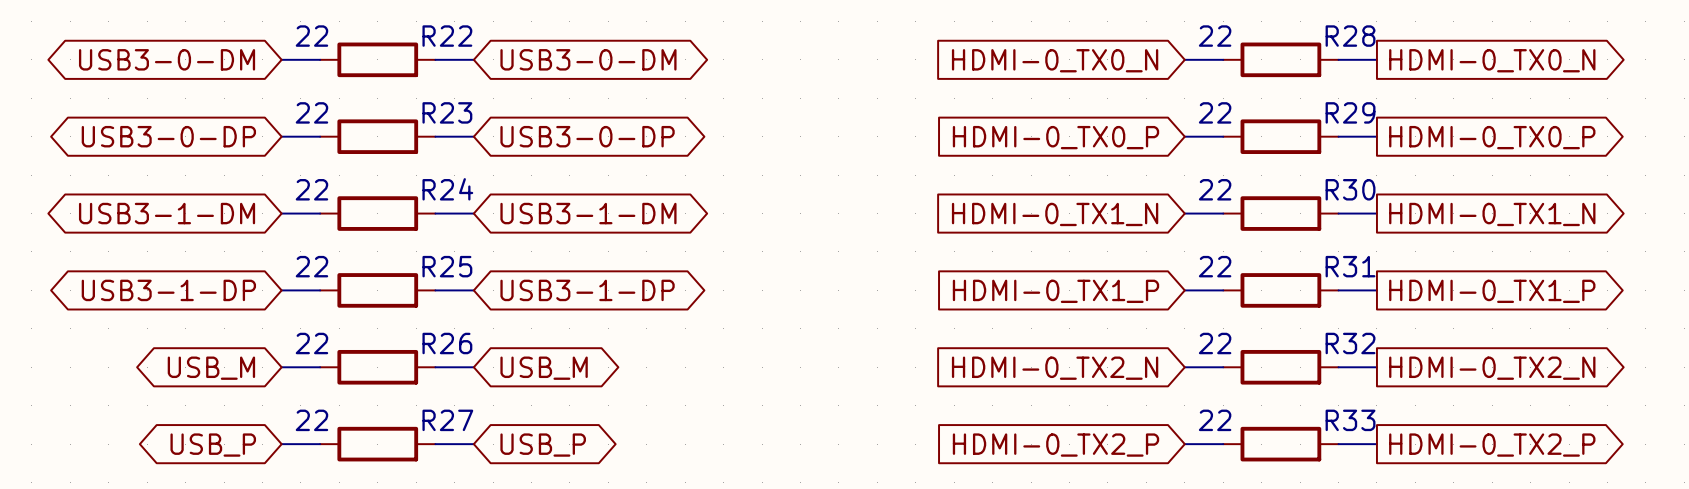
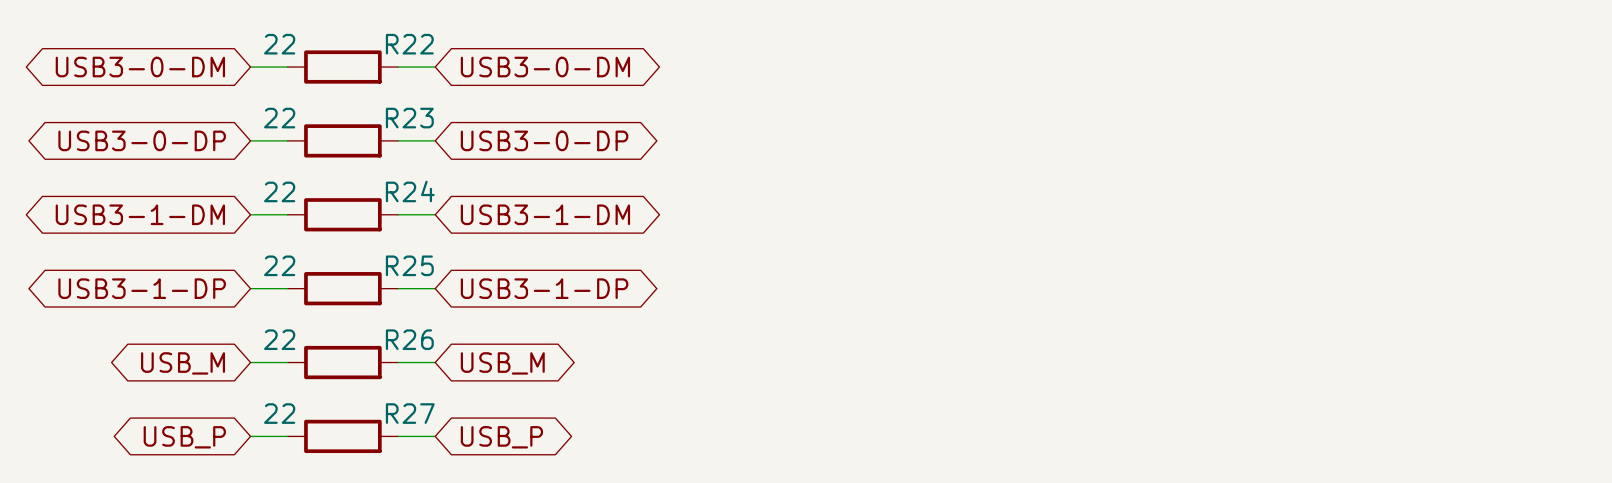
wire: (1184, 59) (1223, 59) -> none
R28: 22 (1280, 59) -> none
wire: (1338, 59) (1376, 59) -> none
global label: HDMI-0_TX0_N (1055, 60) -> none
global label: HDMI-0_TX0_N (1492, 60) -> none
wire: (1184, 136) (1223, 136) -> none
R29: 22 (1280, 136) -> none
wire: (1338, 136) (1376, 136) -> none
global label: HDMI-0_TX0_P (1055, 137) -> none
global label: HDMI-0_TX0_P (1492, 137) -> none
wire: (1184, 213) (1223, 213) -> none
R30: 22 (1280, 213) -> none
wire: (1338, 213) (1376, 213) -> none
global label: HDMI-0_TX1_N (1055, 214) -> none
global label: HDMI-0_TX1_N (1492, 214) -> none
wire: (1184, 290) (1223, 290) -> none
R31: 22 (1280, 290) -> none
wire: (1338, 290) (1376, 290) -> none
global label: HDMI-0_TX1_P (1055, 291) -> none
global label: HDMI-0_TX1_P (1492, 291) -> none
wire: (1184, 367) (1223, 367) -> none
R32: 22 (1280, 367) -> none
wire: (1338, 367) (1376, 367) -> none
global label: HDMI-0_TX2_N (1055, 368) -> none
global label: HDMI-0_TX2_N (1492, 368) -> none
wire: (1184, 444) (1223, 444) -> none
R33: 22 (1280, 444) -> none
wire: (1338, 444) (1376, 444) -> none
global label: HDMI-0_TX2_P (1055, 445) -> none
global label: HDMI-0_TX2_P (1492, 445) -> none

